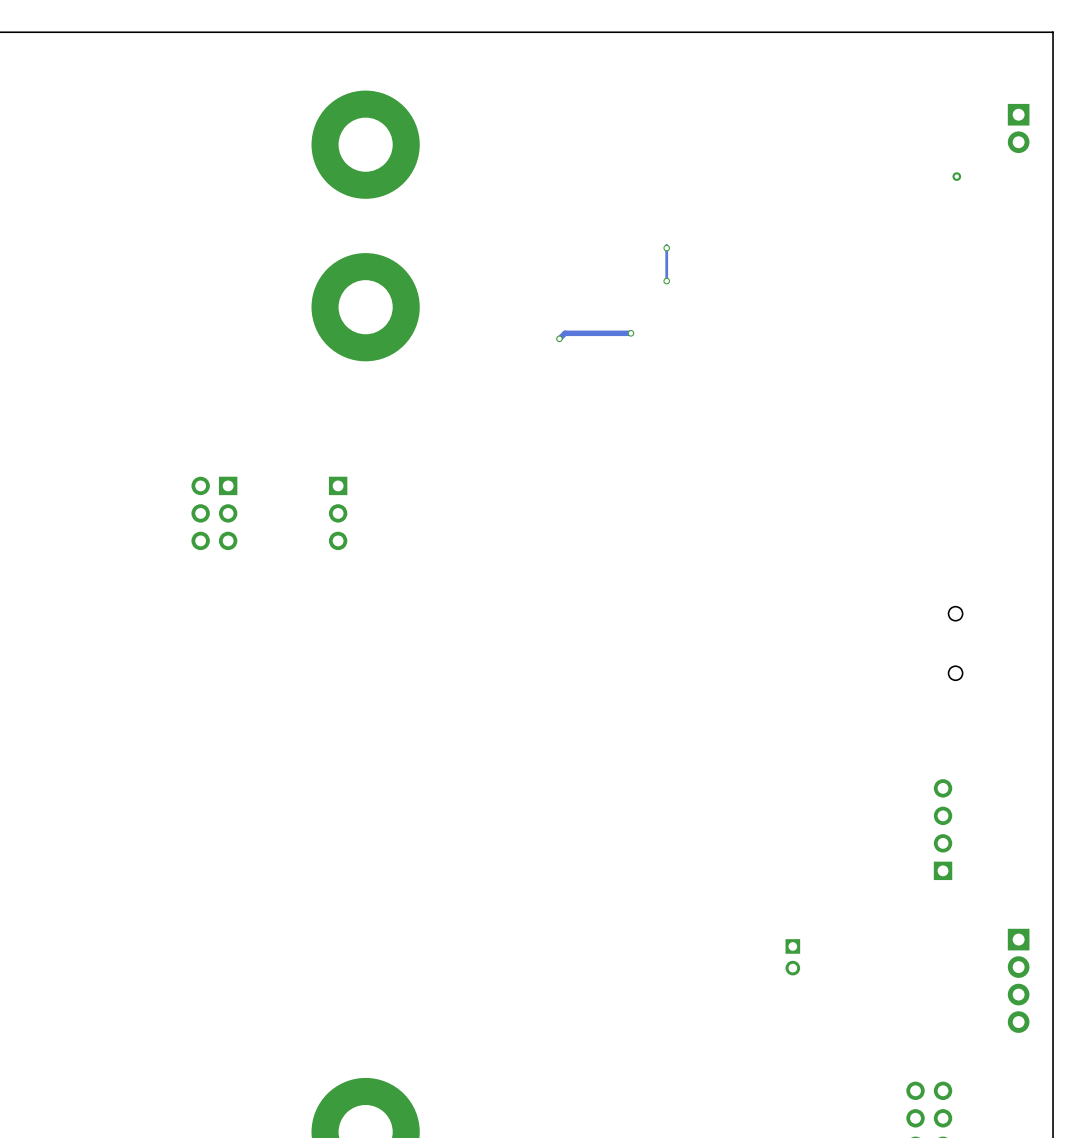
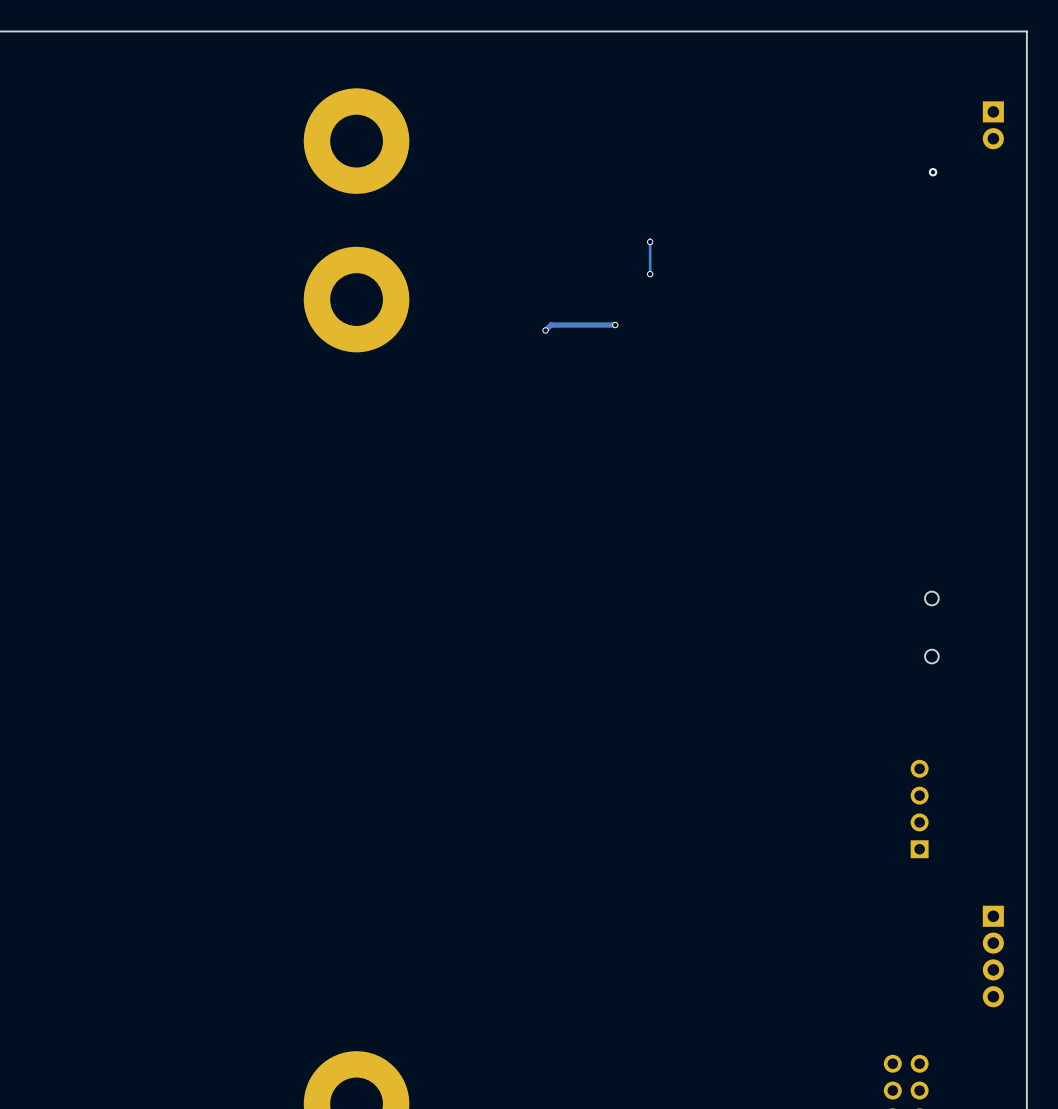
part: (214, 513) -> none
part: (338, 513) -> none
part: (792, 957) -> none

